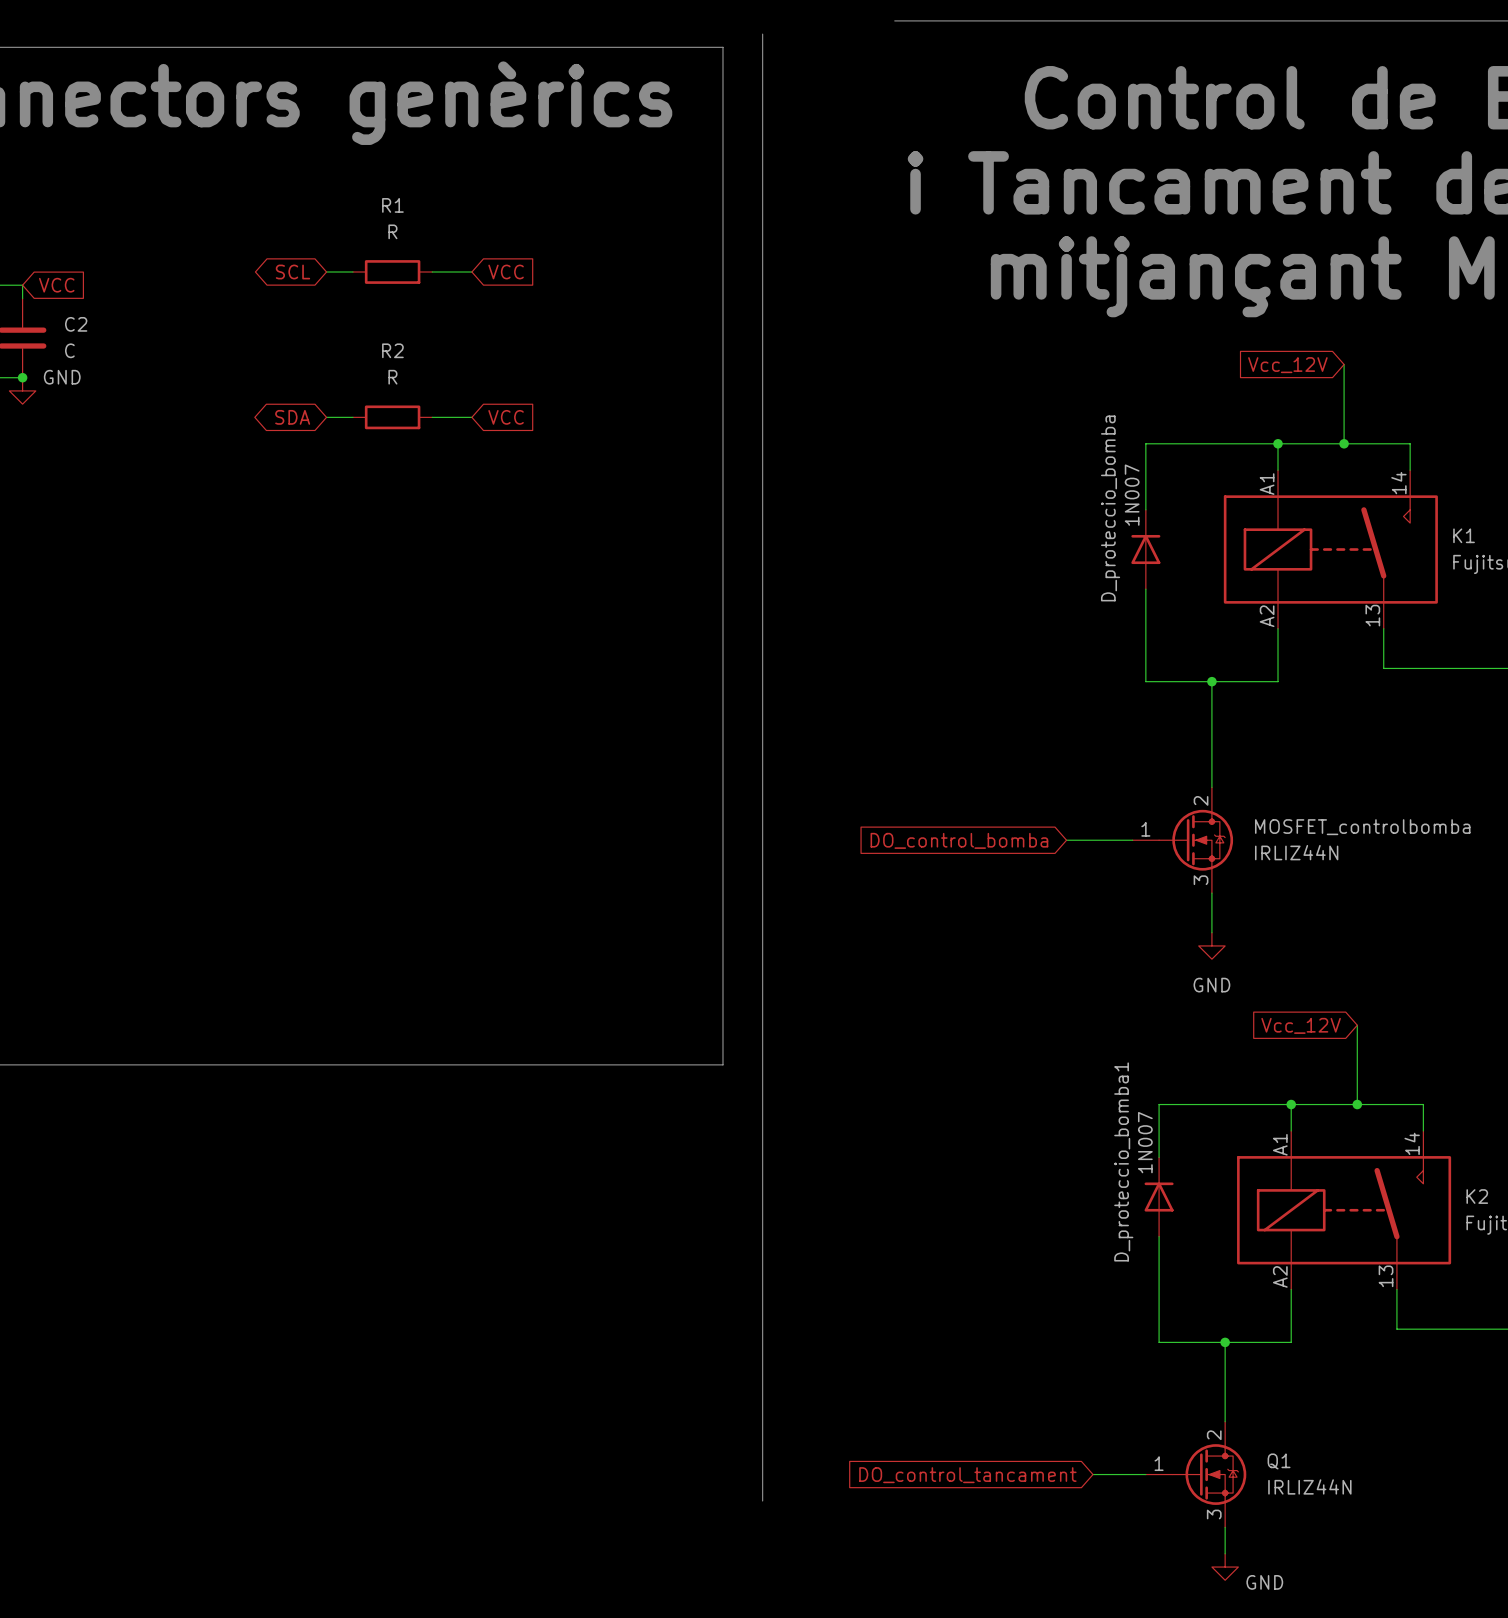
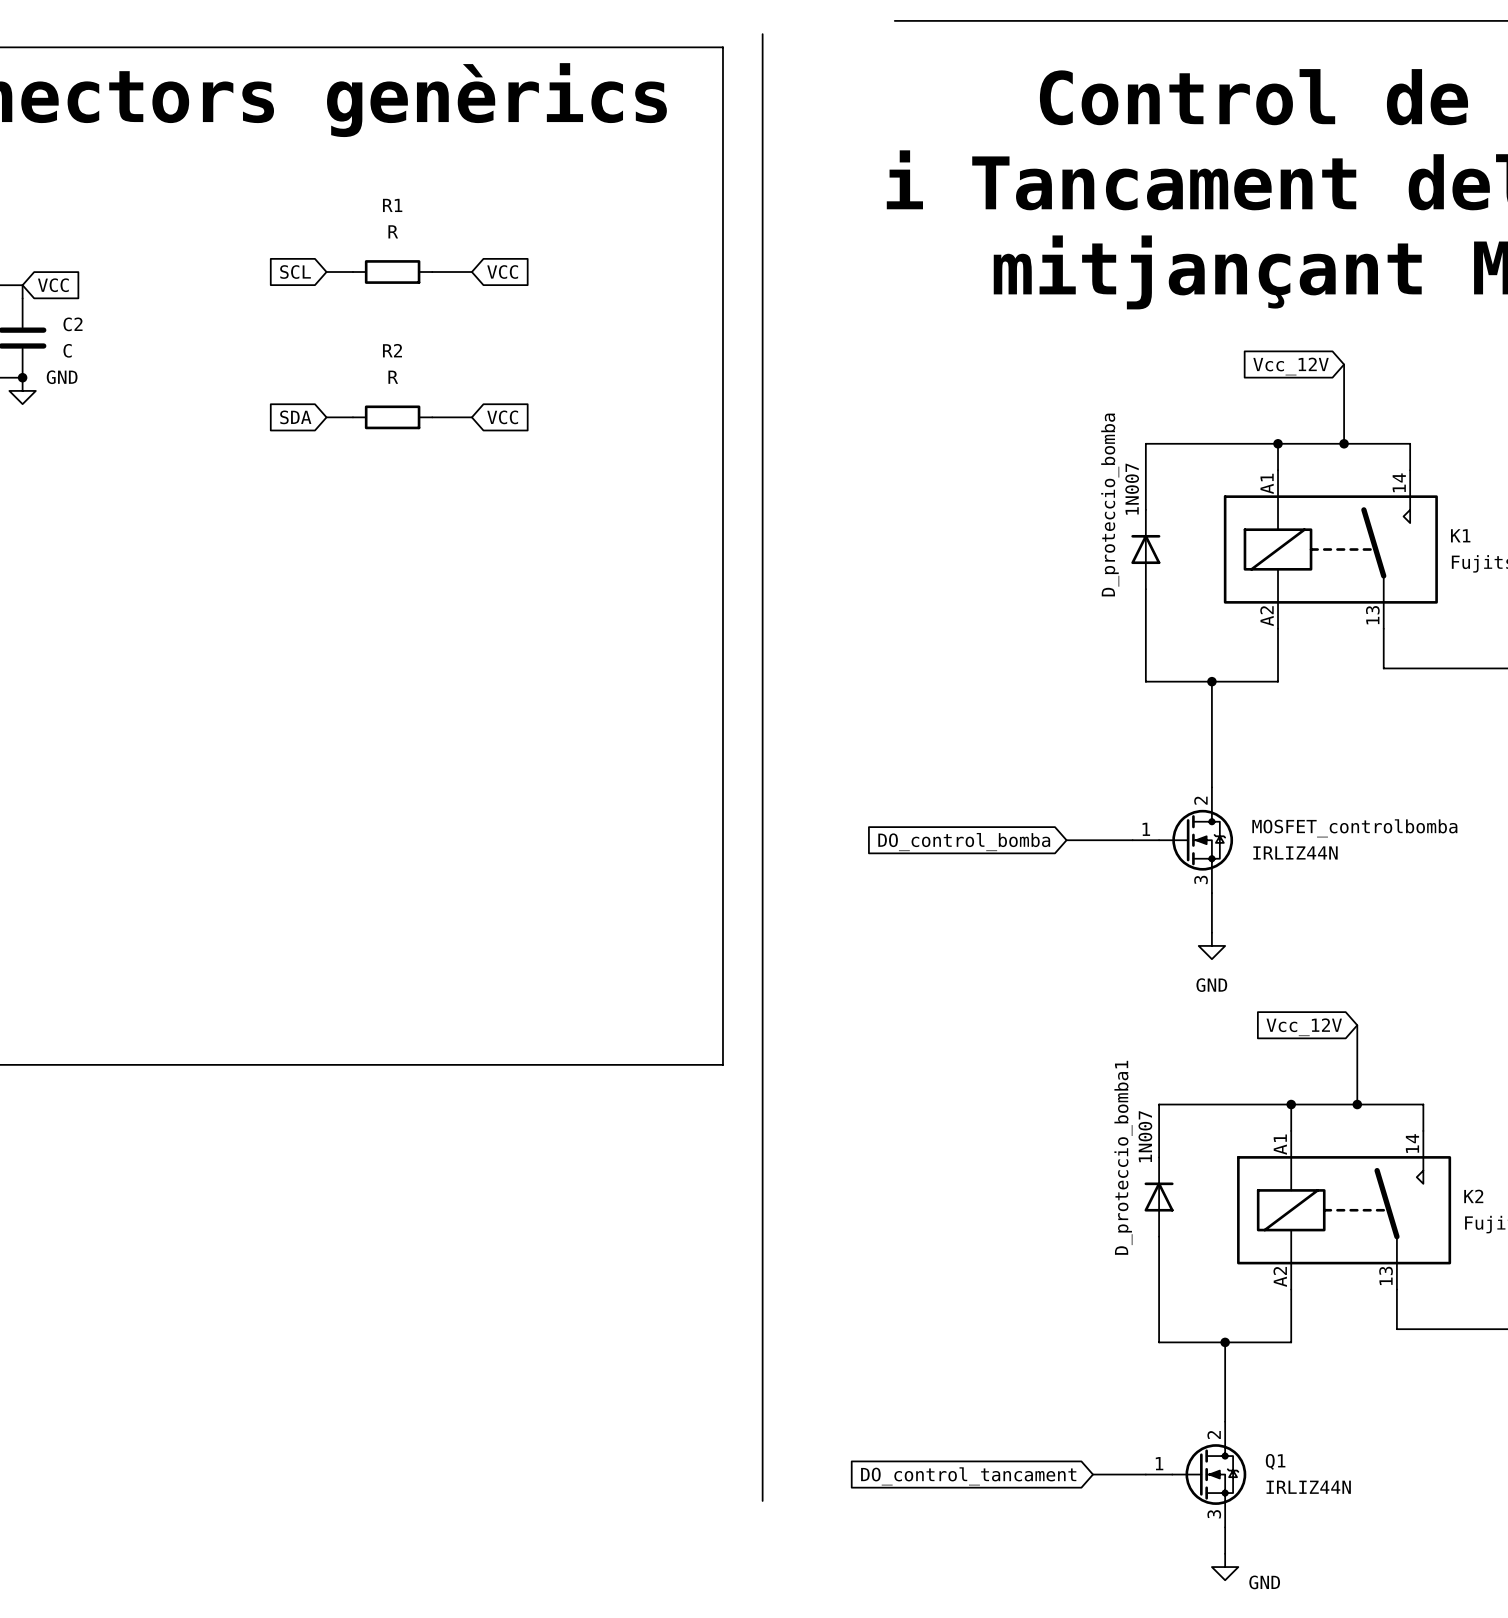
global label shape: bidirectional (292, 272) -> input (295, 272)
global label shape: bidirectional (292, 417) -> input (295, 417)

